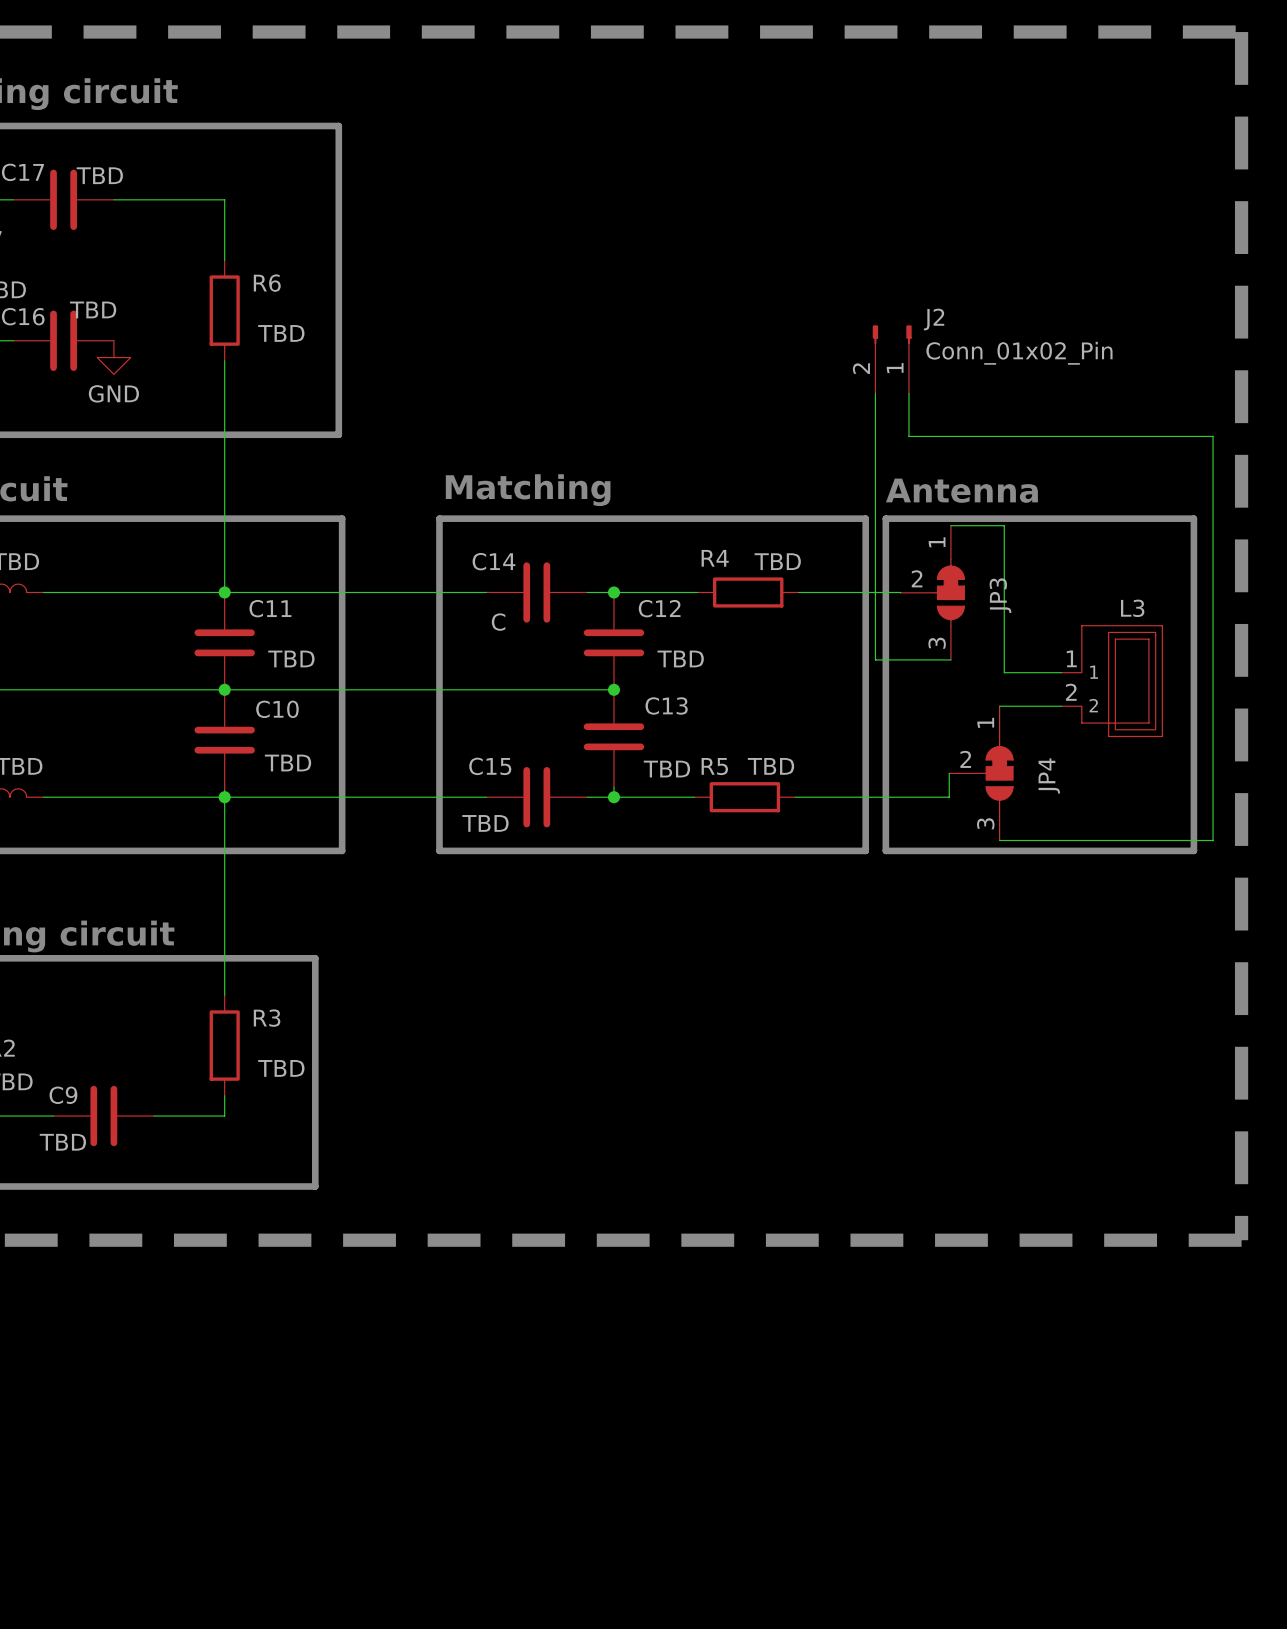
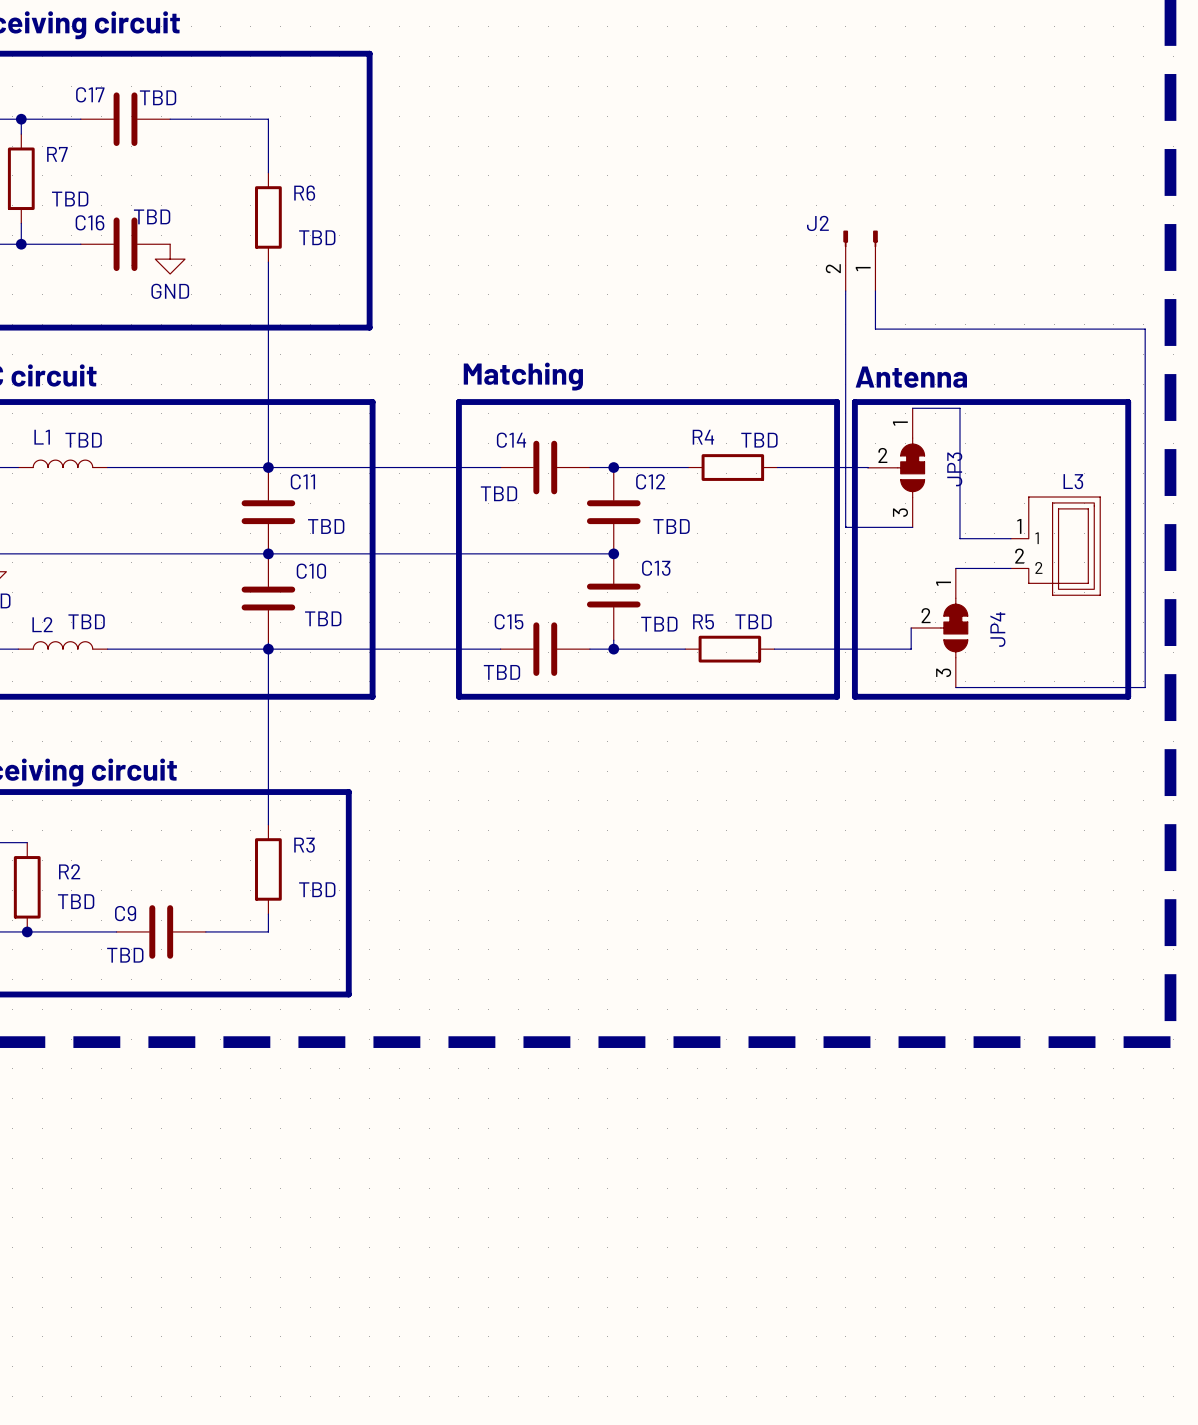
J2 name position: J2 (934, 319) -> J2 (817, 223)
J2 value: Conn_01x02_Pin (1019, 353) -> none
C14 value: C (498, 622) -> TBD (498, 493)

